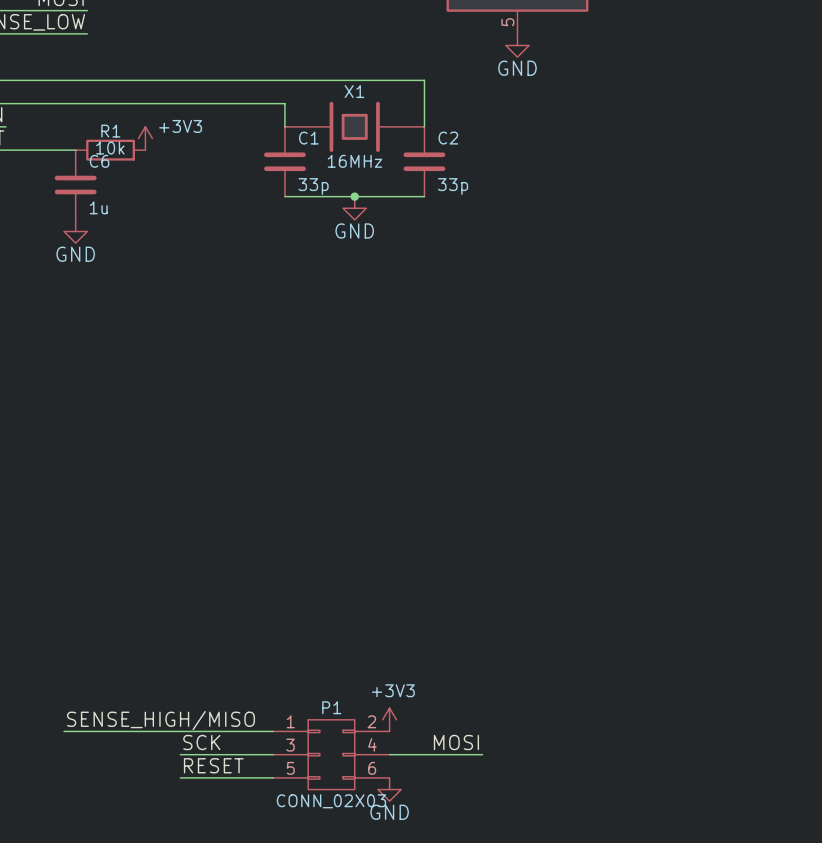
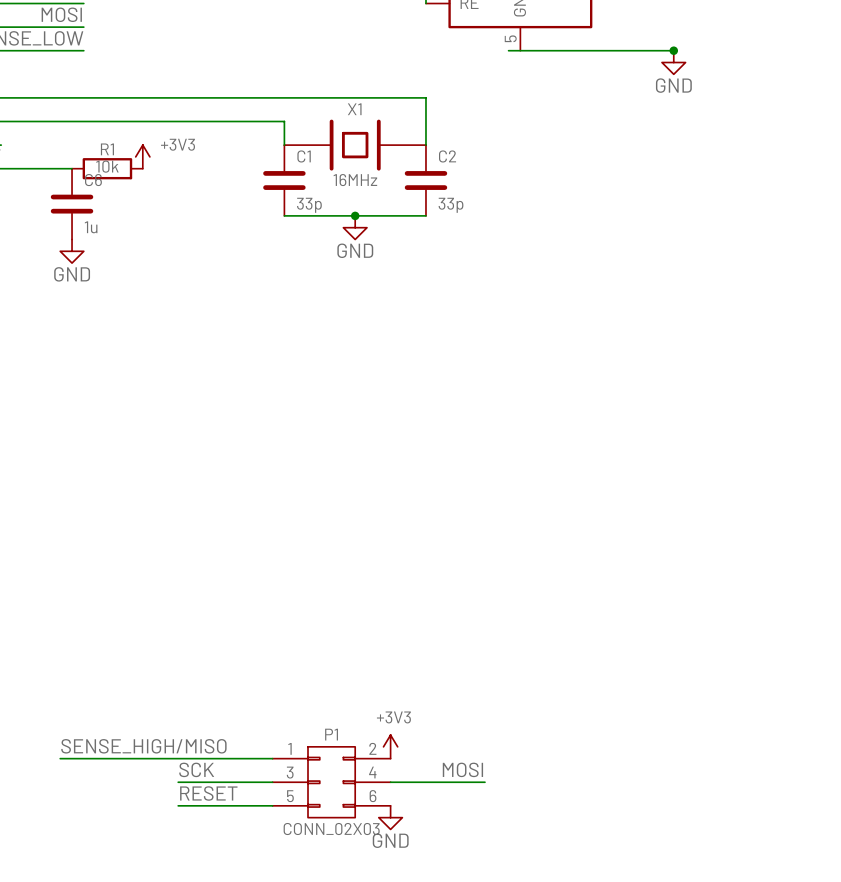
wire: none -> (508, 50) (673, 50)
junction: none -> (673, 50)
power symbol position: GND (517, 45) -> GND (673, 62)

